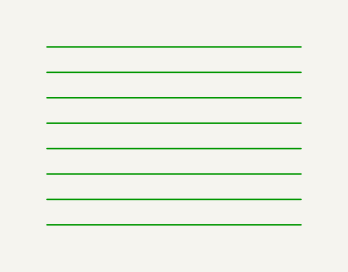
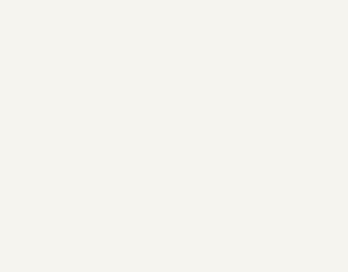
wire: (46, 46) (301, 46) -> none
wire: (46, 72) (301, 72) -> none
wire: (46, 97) (301, 97) -> none
wire: (46, 123) (301, 123) -> none
wire: (46, 148) (301, 148) -> none
wire: (46, 174) (301, 174) -> none
wire: (46, 199) (301, 199) -> none
wire: (46, 224) (301, 224) -> none

